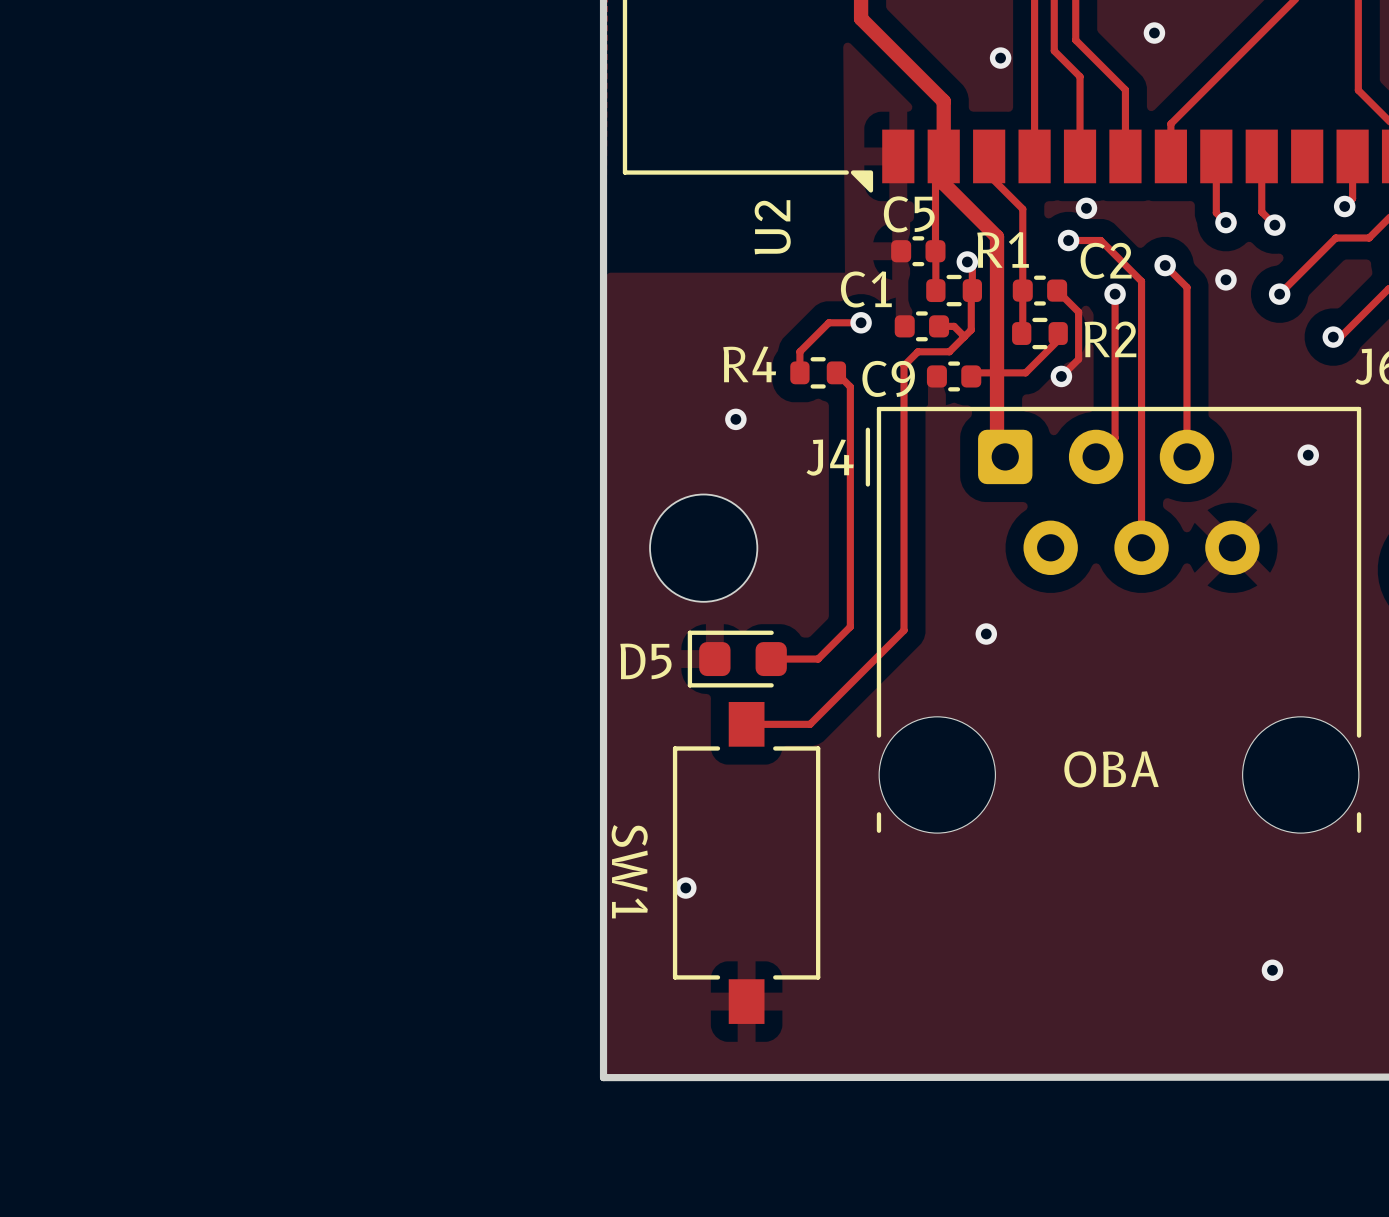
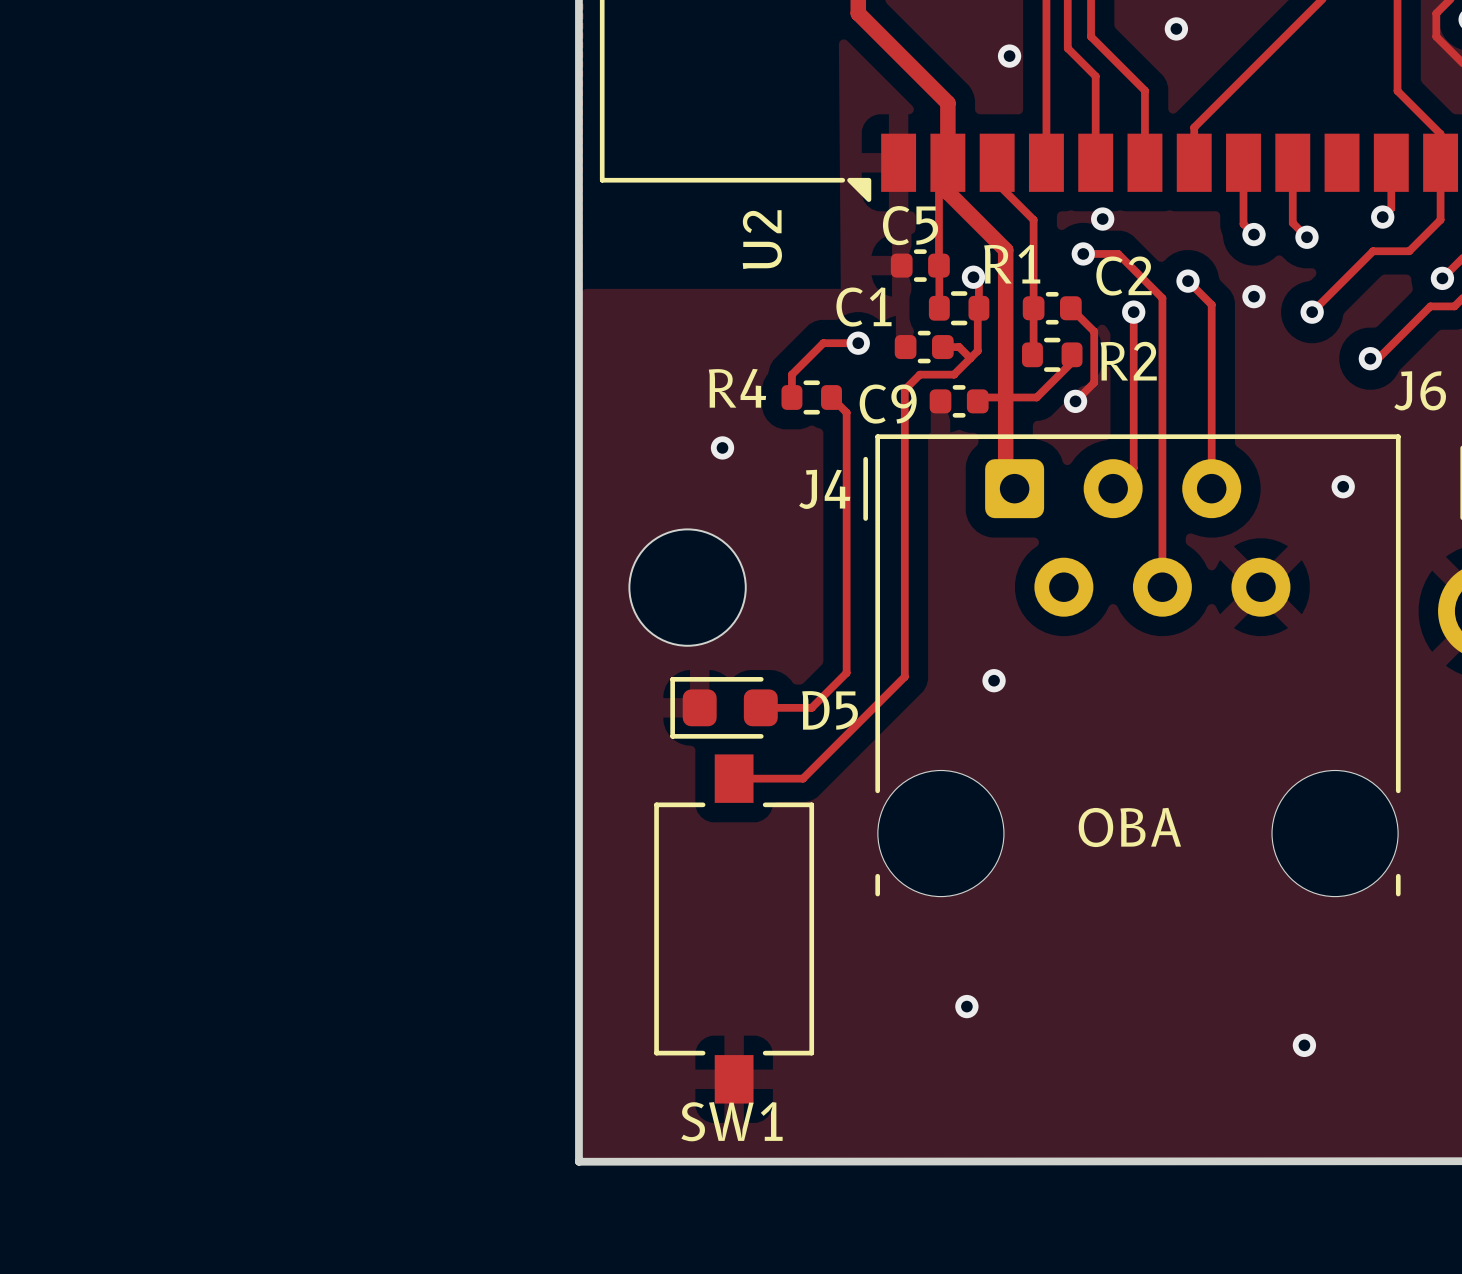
D5 name position: D5 (645, 661) -> D5 (830, 710)
SW1 name rotation: 0° (629, 871) -> 90° counterclockwise (731, 1121)
SW1 name position: SW1 (629, 871) -> SW1 (731, 1121)
via: (685, 888) -> none
via: none -> (966, 1006)

